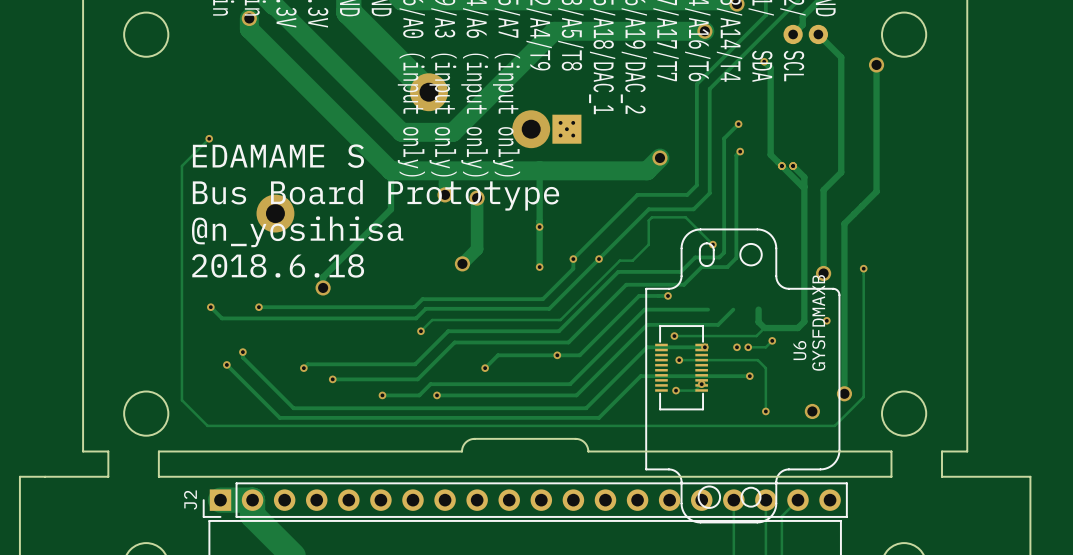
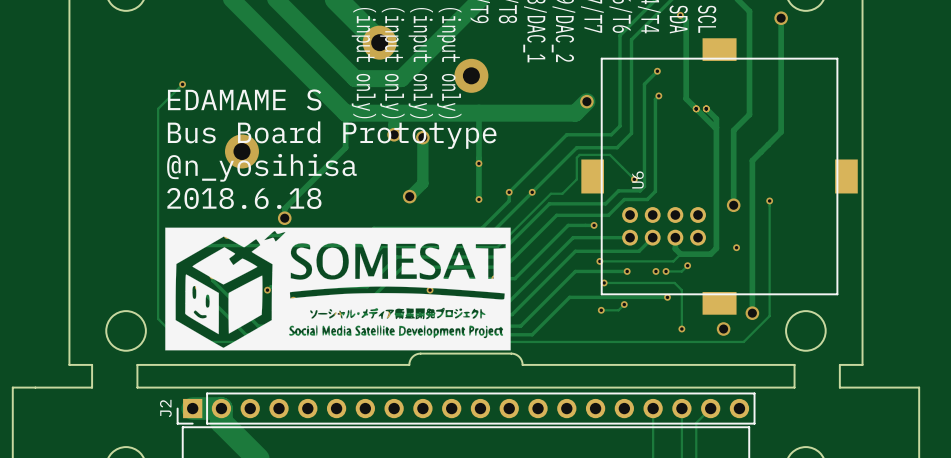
part: (566, 129) -> none
U6 footprint: [645, 228, 841, 524] -> [581, 38, 858, 315]
drawing: none -> [165, 227, 511, 351]
U6 value: GYSFDMAXB (818, 322) -> none
U6 name position: U6 (799, 350) -> U6 (637, 179)

